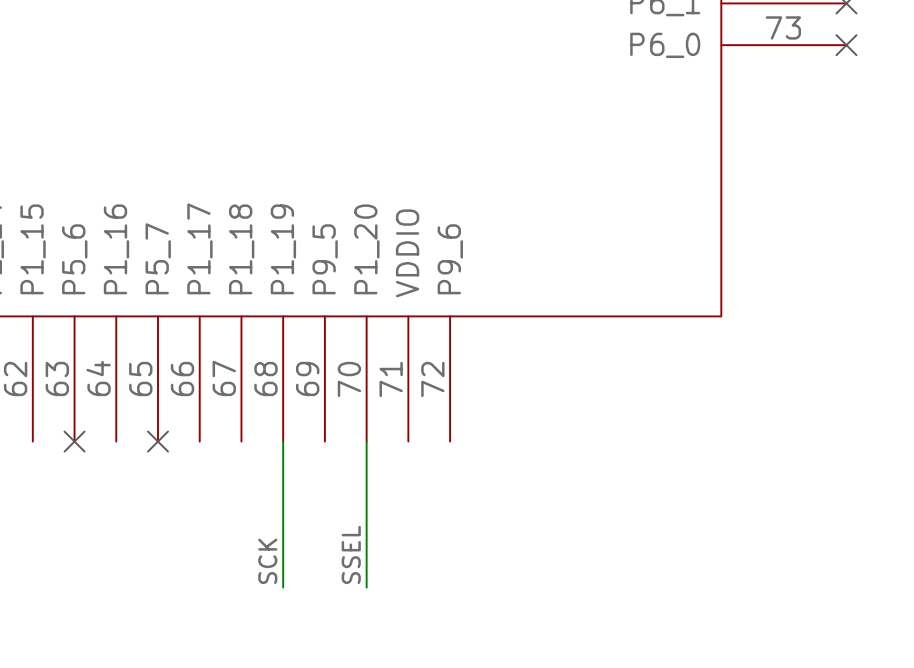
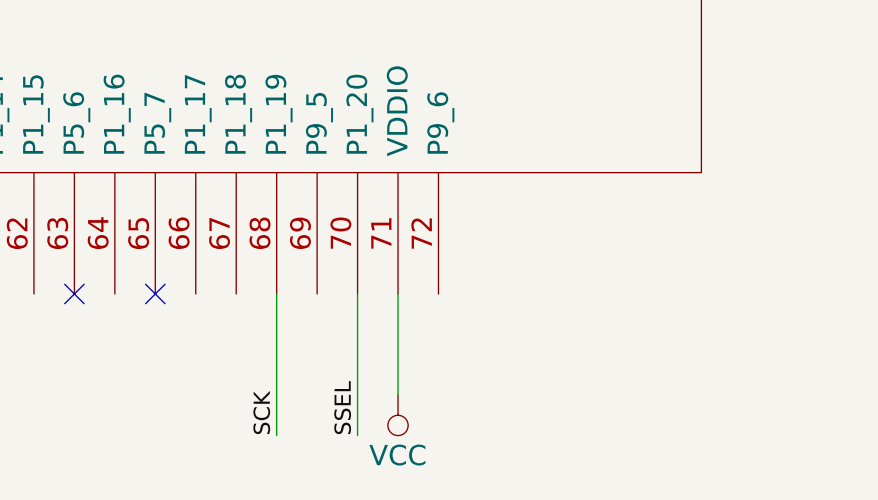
wire: none -> (398, 293) (398, 395)
power symbol: none -> VCC (398, 415)

